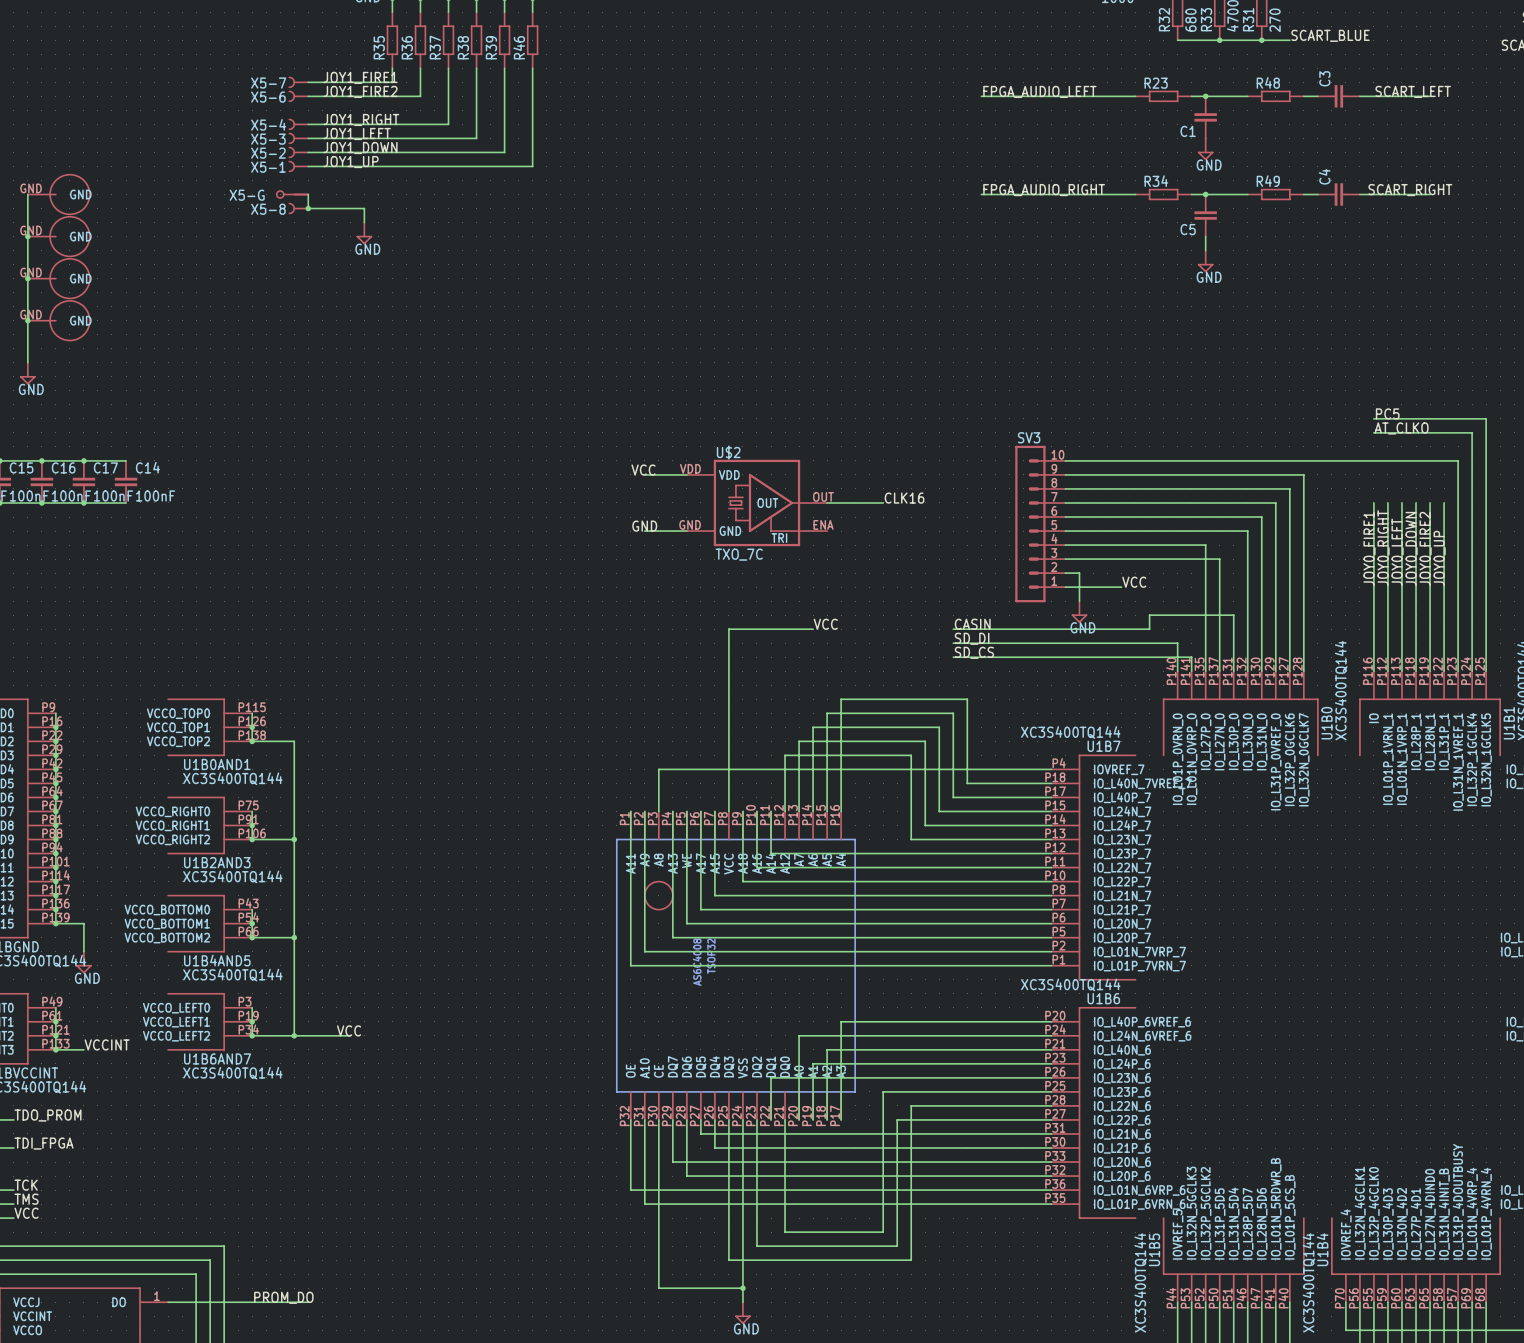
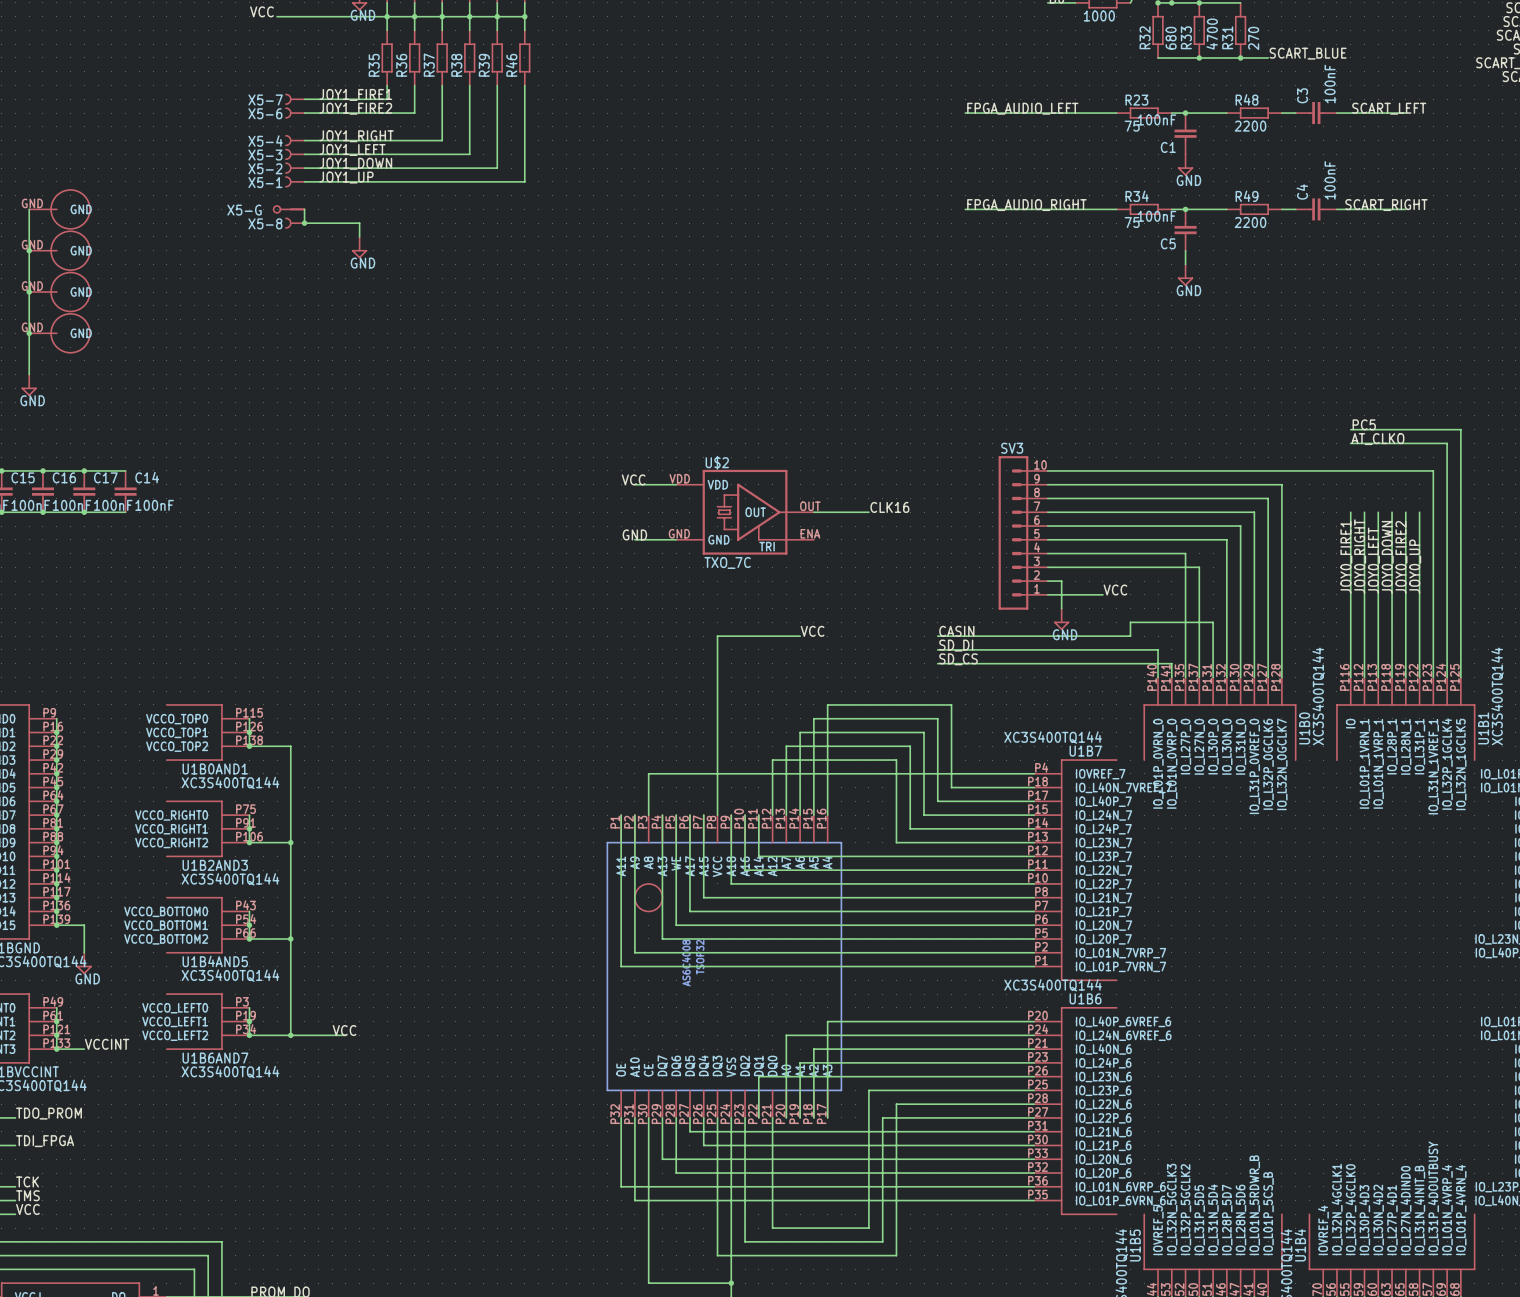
C3 value: none -> 100nF (1330, 84)
C1 value: none -> 100nF (1156, 119)
R23 value: none -> 75 (1132, 126)
R48 value: none -> 2200 (1250, 126)
C4 value: none -> 100nF (1330, 180)
C5 value: none -> 100nF (1156, 216)
R34 value: none -> 75 (1132, 222)
R49 value: none -> 2200 (1250, 222)

